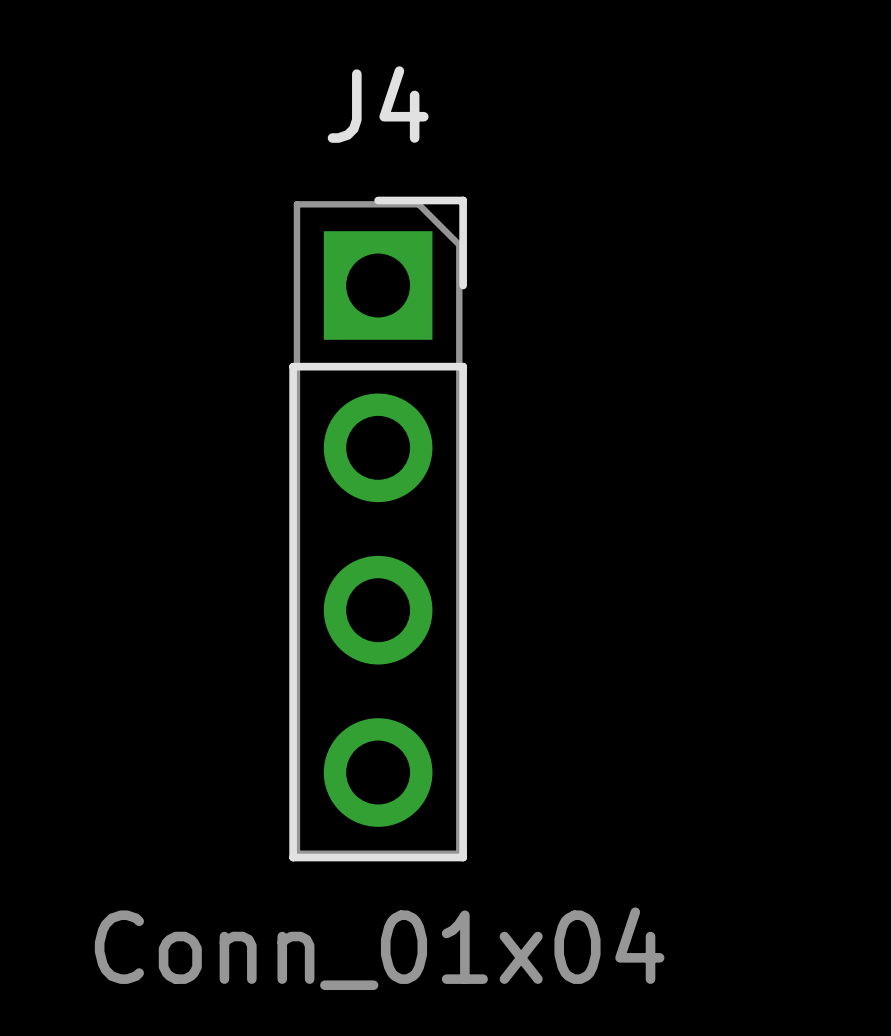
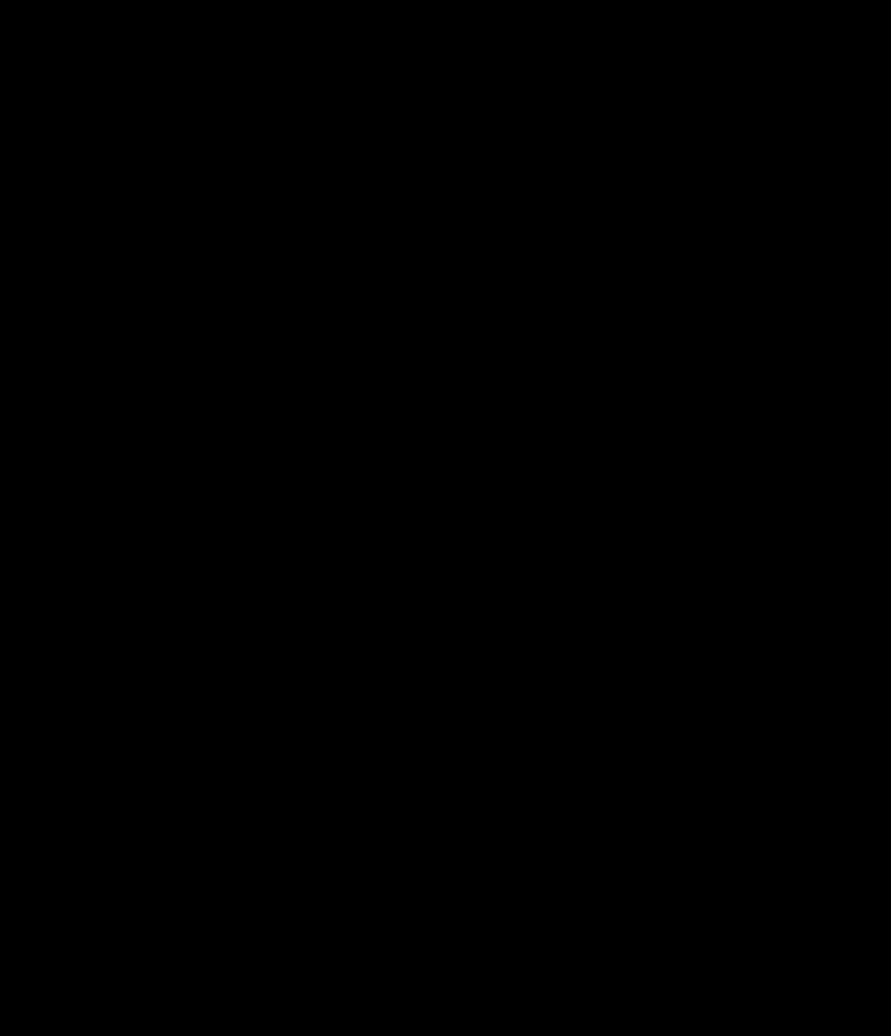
J4: Conn_01x04 (378, 529) -> none

